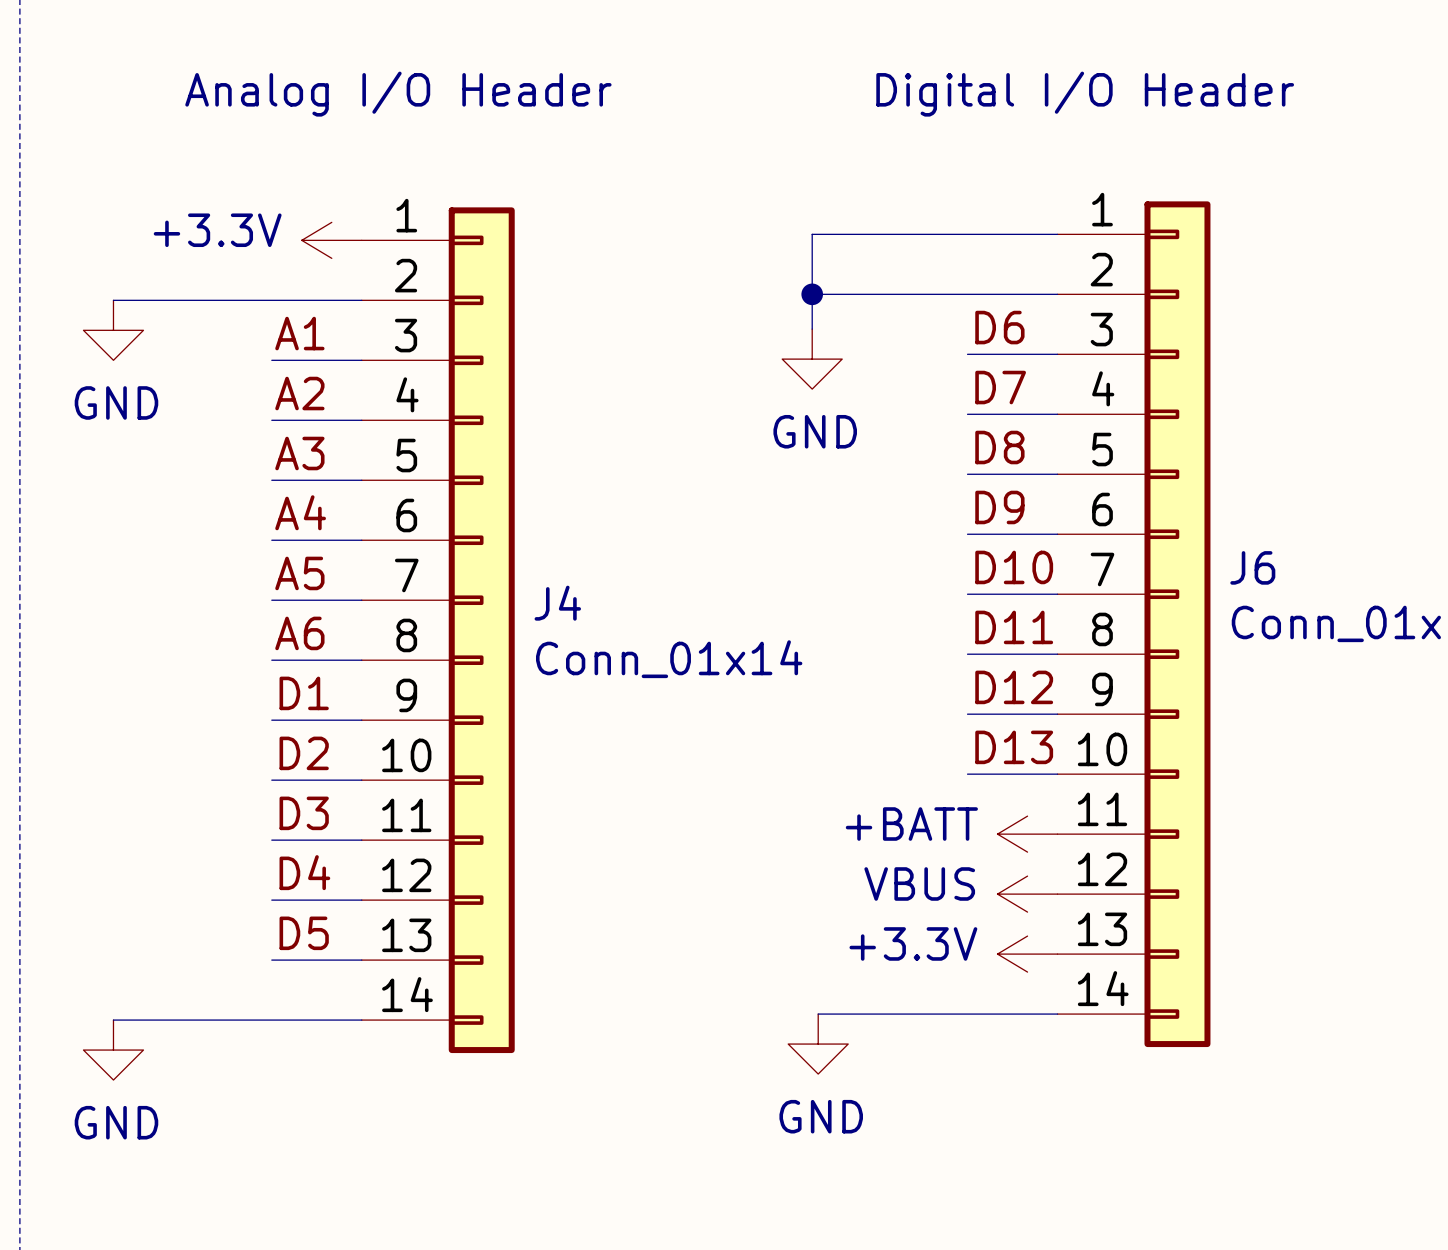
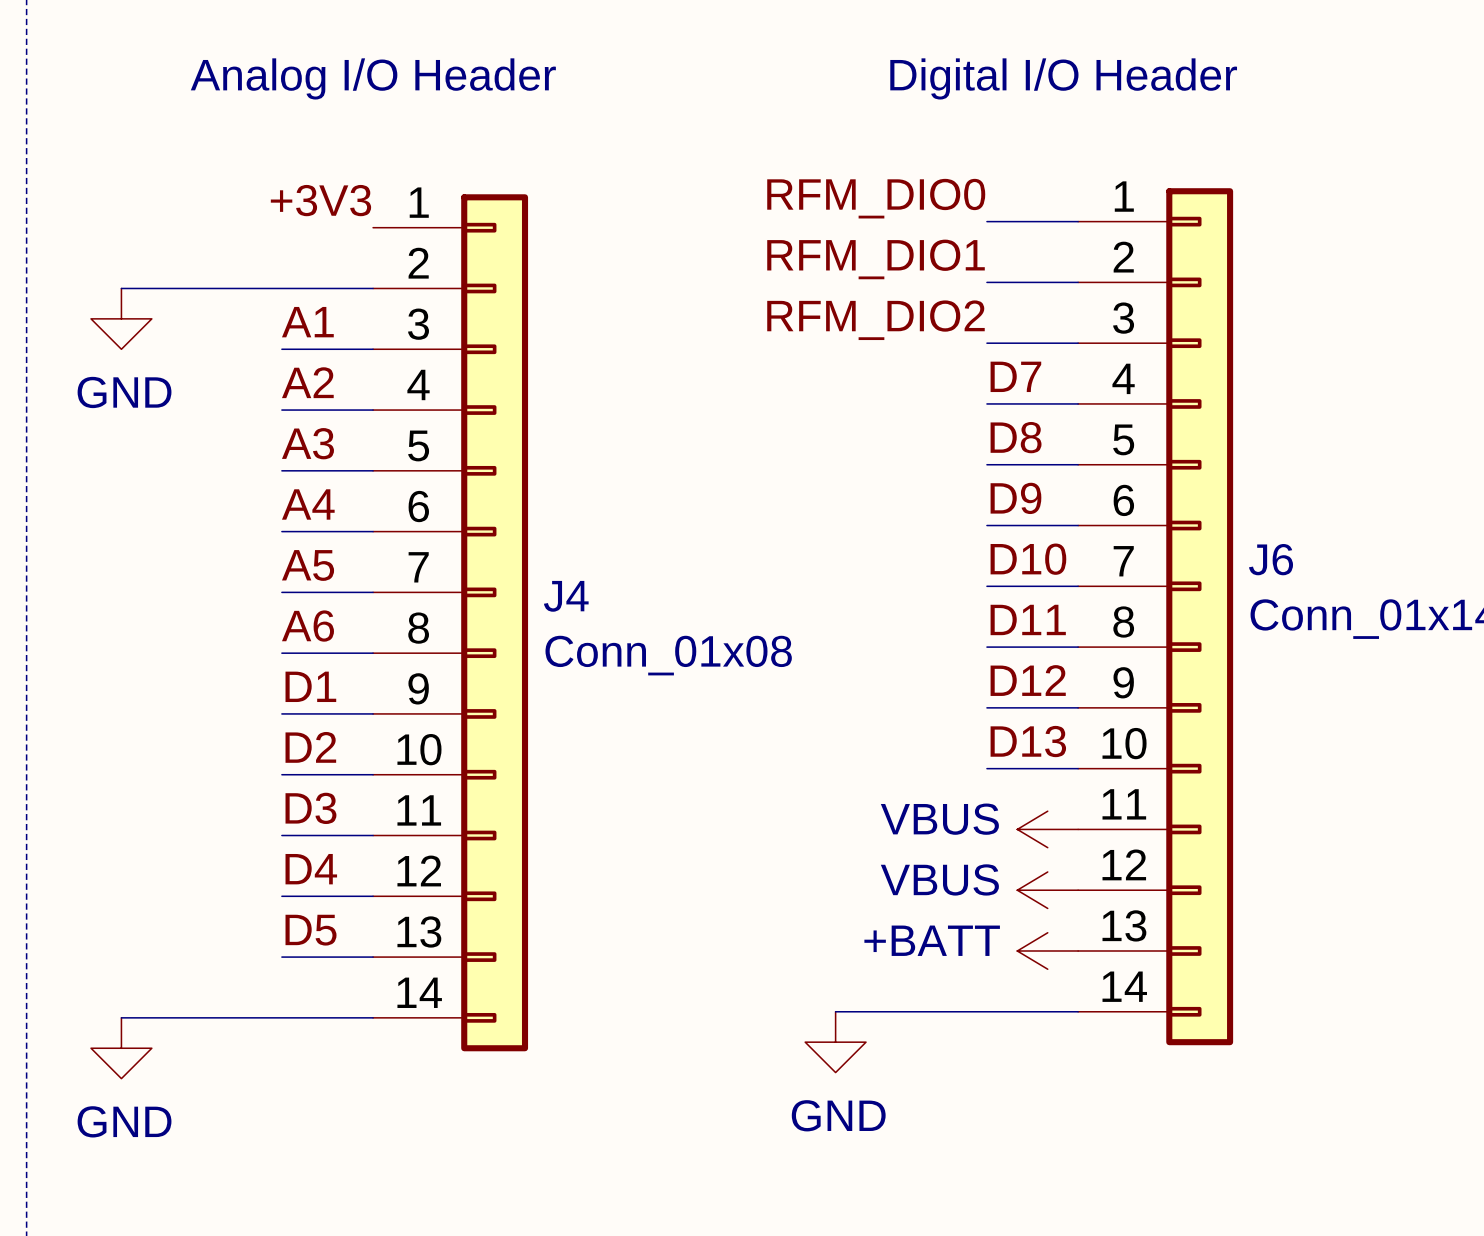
label: none -> RFM_DIO0 (876, 198)
label: none -> +3V3 (320, 200)
wire: (967, 234) (812, 234) (812, 329) -> none
power symbol: +3.3V (331, 240) -> none
label: none -> RFM_DIO1 (876, 259)
wire: (812, 294) (967, 294) -> none
junction: (812, 294) -> none
label: D6 (999, 327) -> RFM_DIO2 (875, 320)
power symbol: GND (812, 359) -> none
J4 value: Conn_01x14 (669, 659) -> Conn_01x08 (668, 655)
power symbol: +BATT (1027, 834) -> VBUS (1047, 829)
power symbol: +3.3V (1027, 954) -> +BATT (1047, 950)

